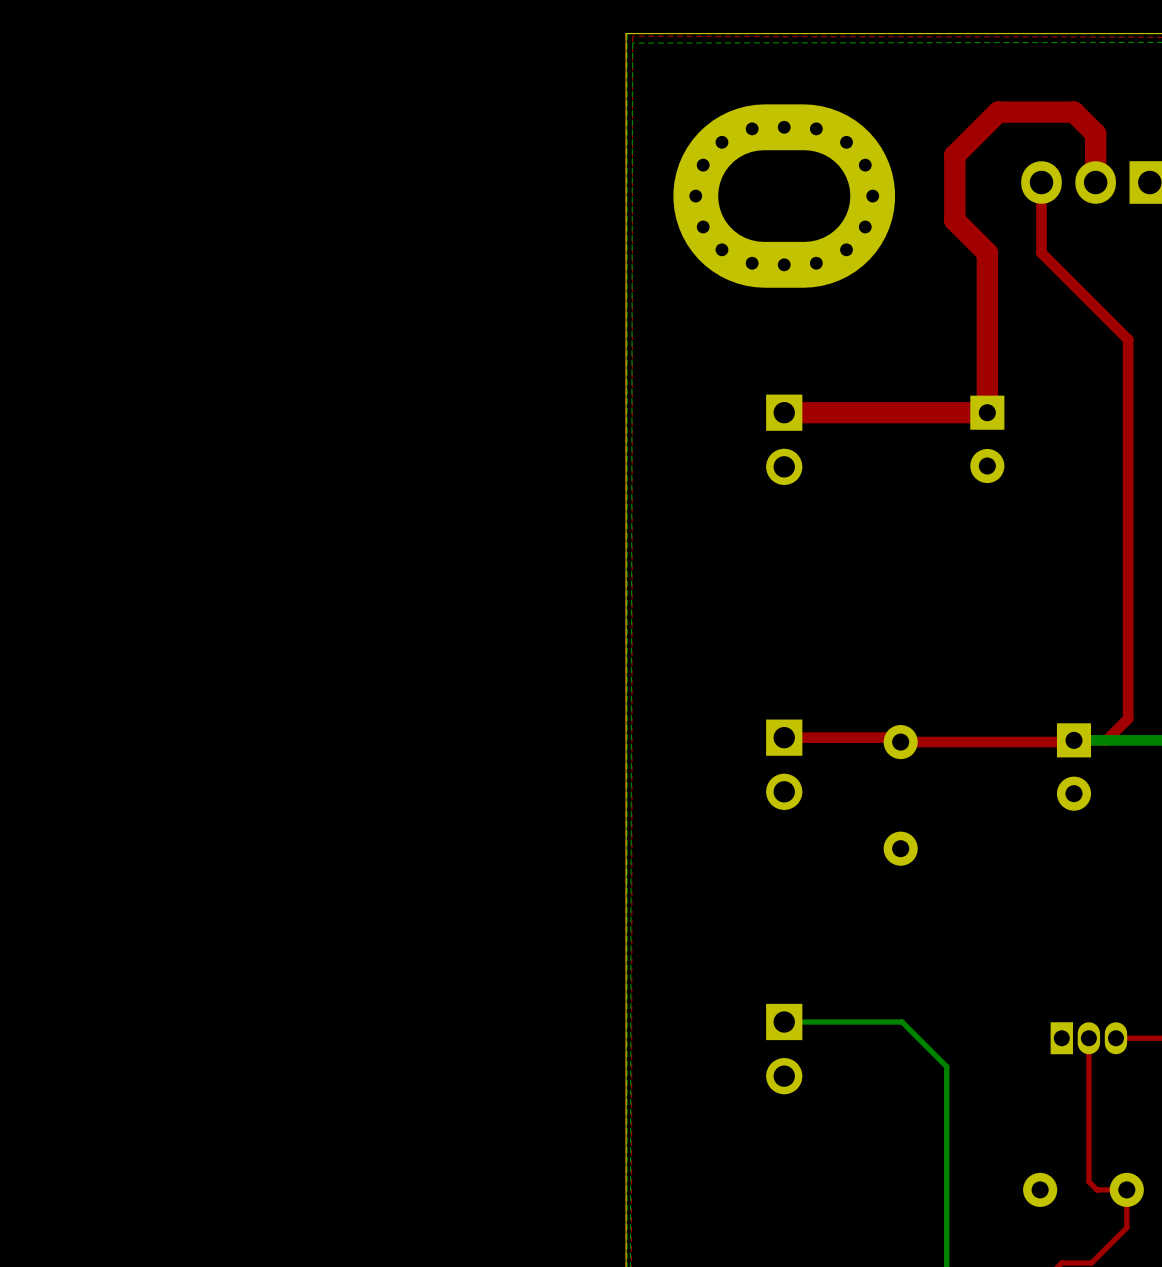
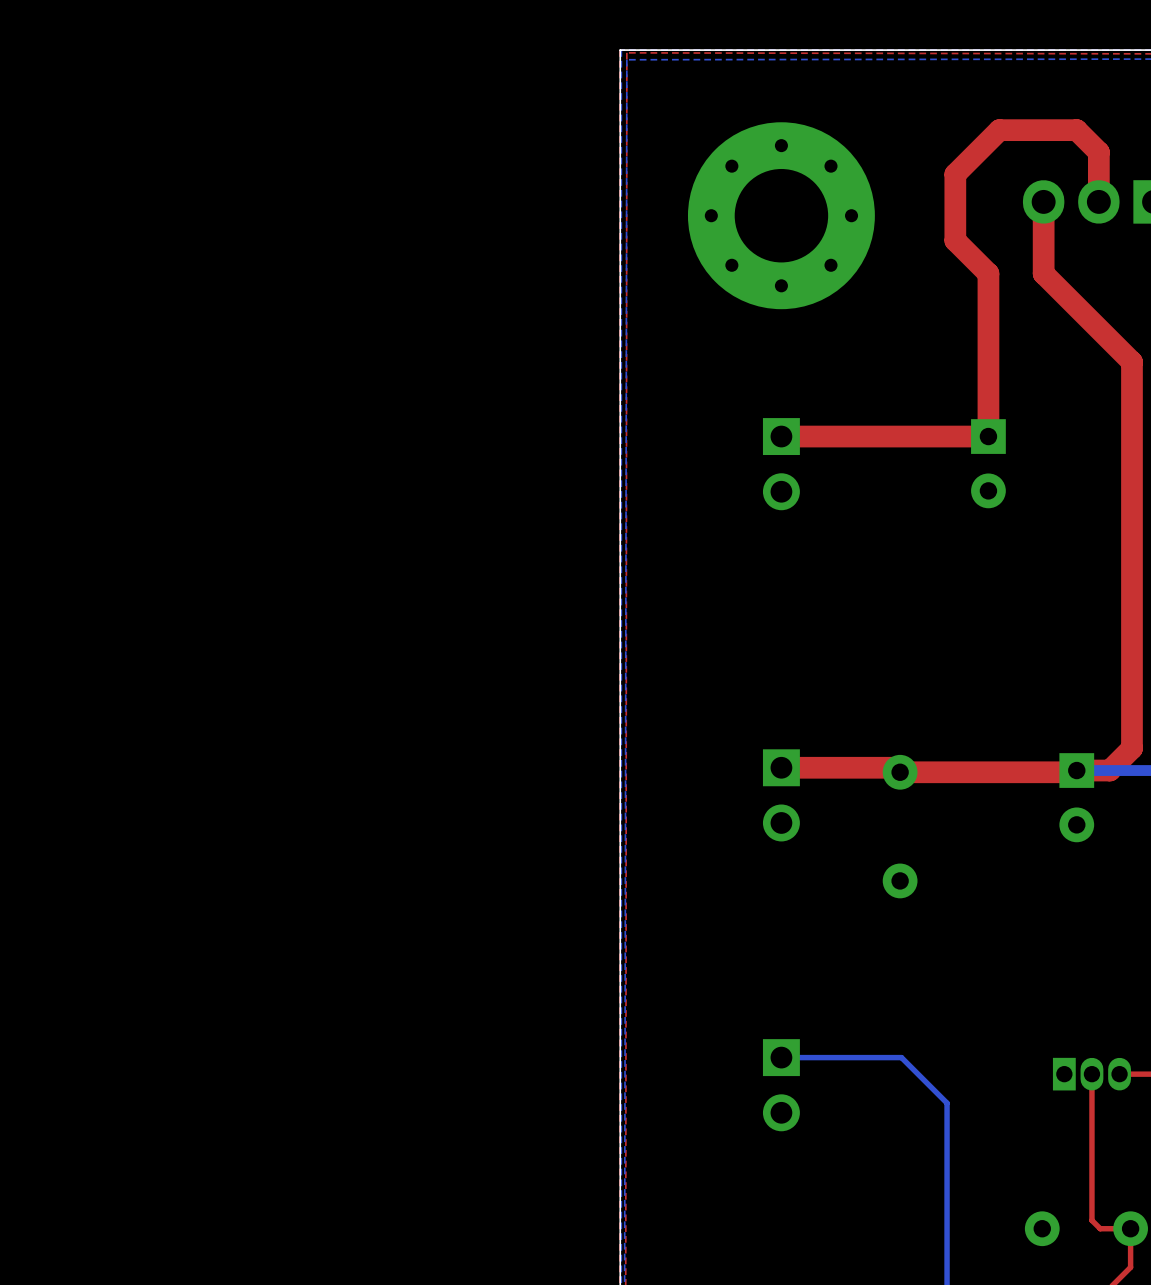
part footprint: [673, 104, 896, 288] -> [687, 122, 875, 310]
top track width: thin (1041, 182) (1041, 252) (1128, 339) (1128, 718) (1106, 740) (1073, 740) -> thick (1043, 201) (1043, 273) (1131, 362) (1131, 748) (1109, 770) (1076, 770)
top track width: thin (896, 737) (784, 737) -> thick (895, 767) (781, 767)
top track width: thin (1072, 742) (900, 742) -> thick (1075, 772) (900, 772)

